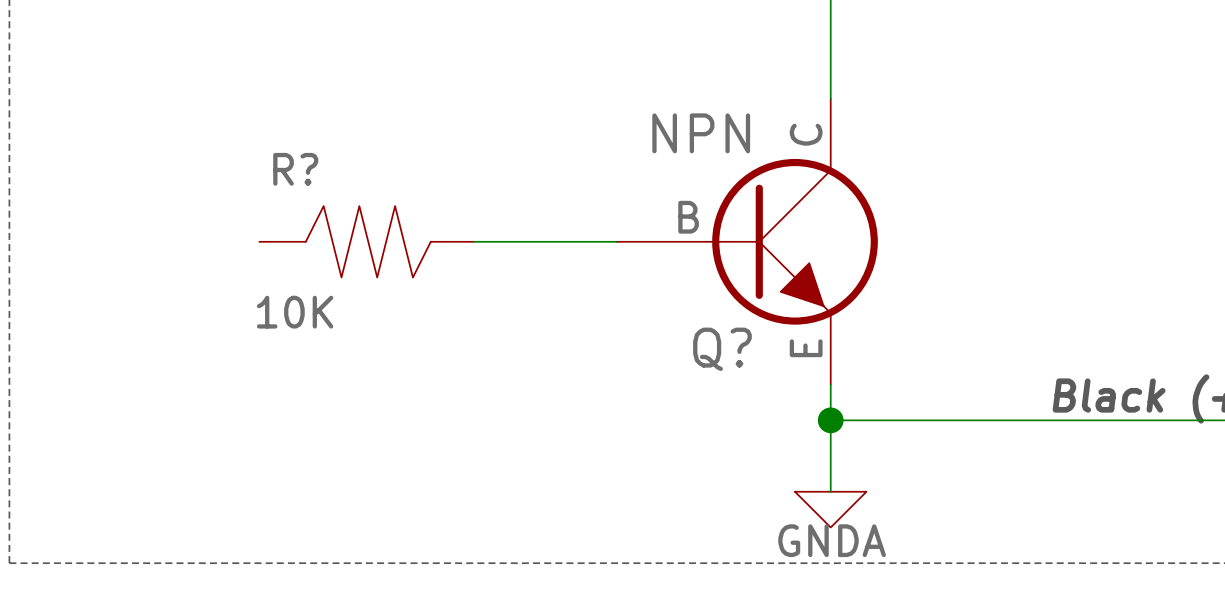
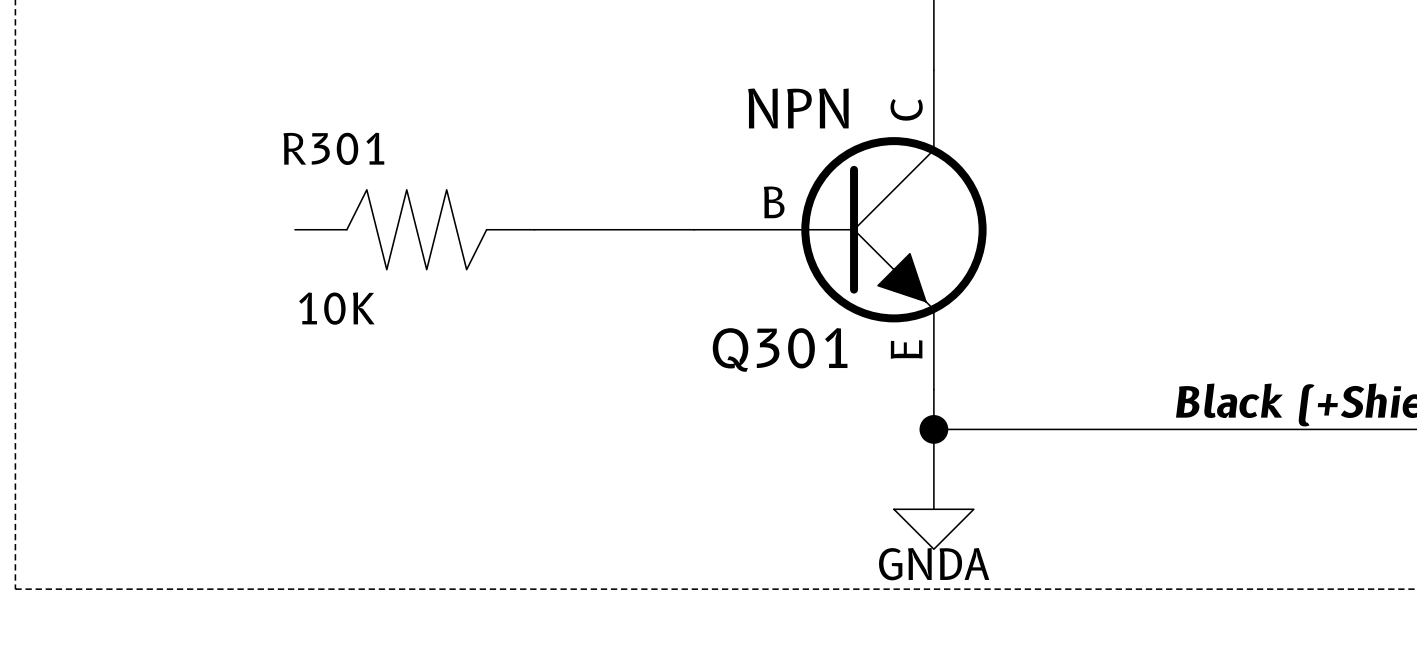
R? name: R? (295, 169) -> R301 (333, 148)
Q? name: Q? (722, 349) -> Q301 (780, 349)

